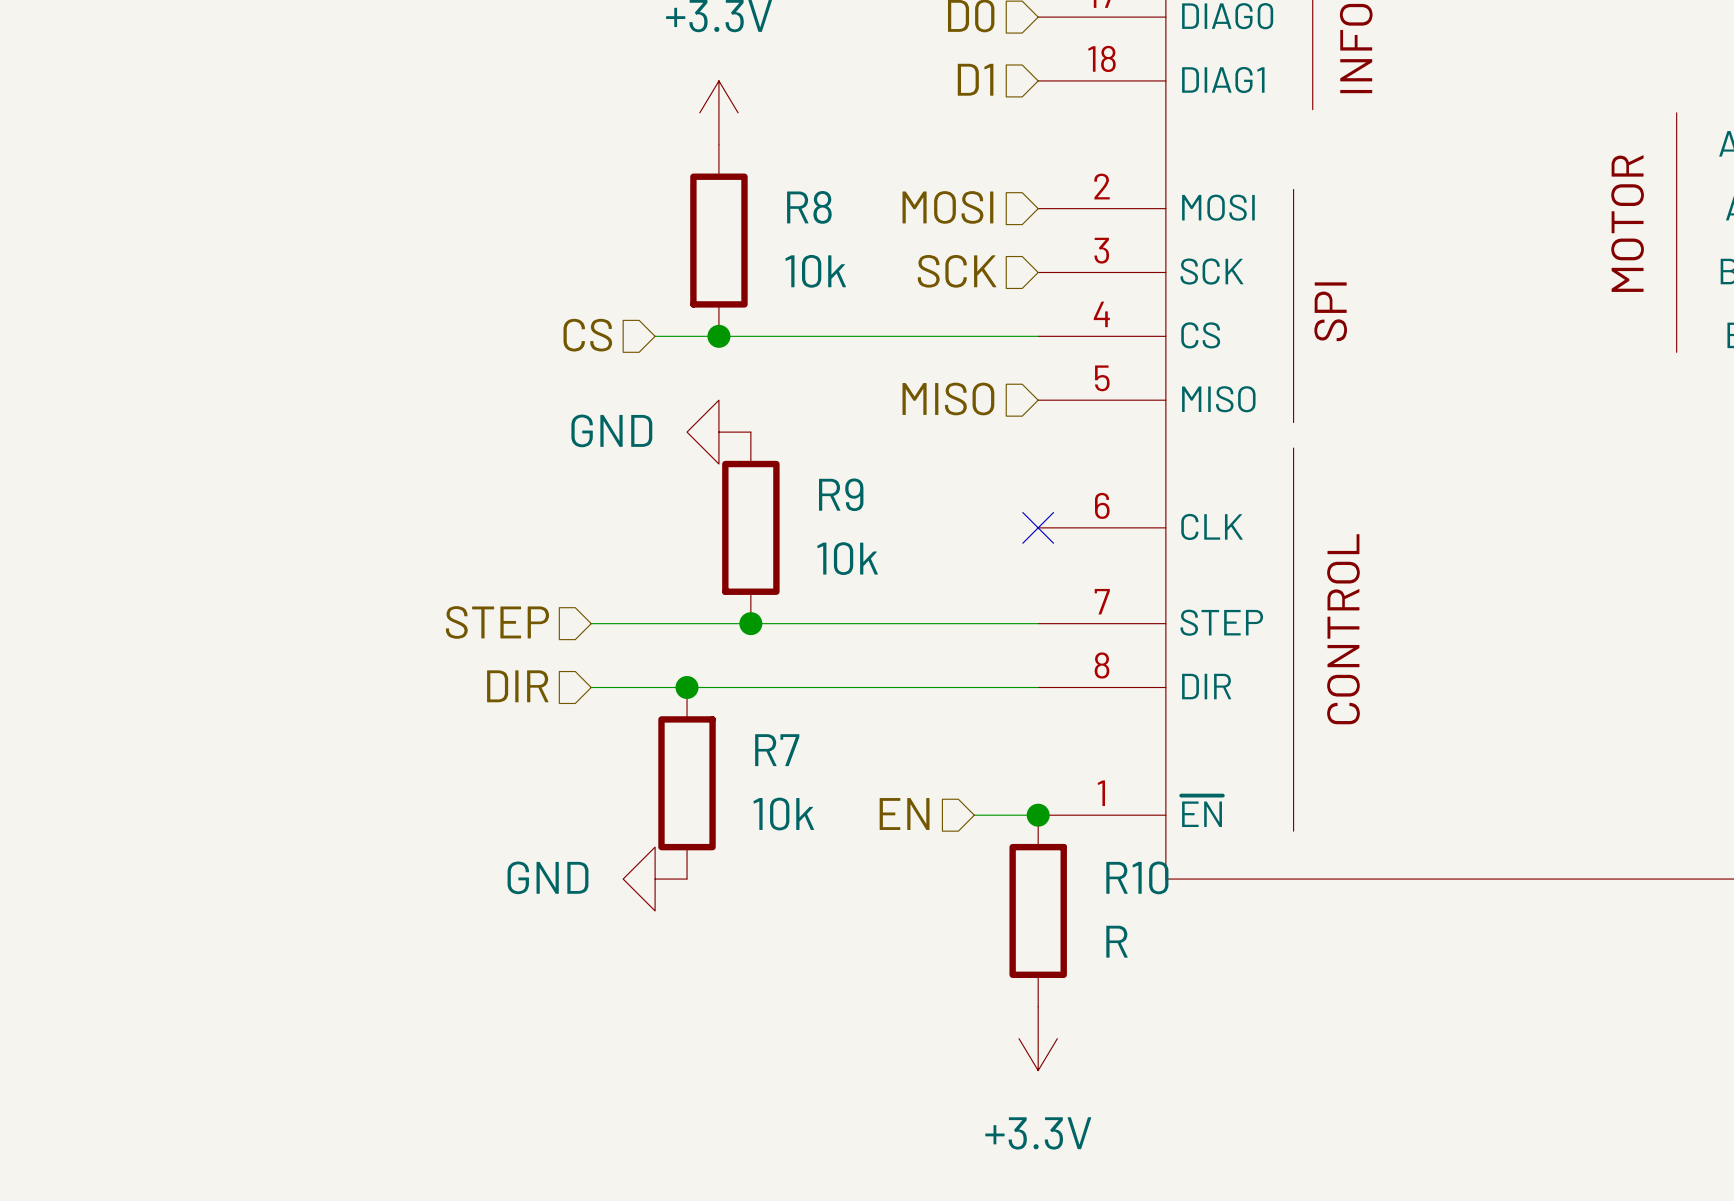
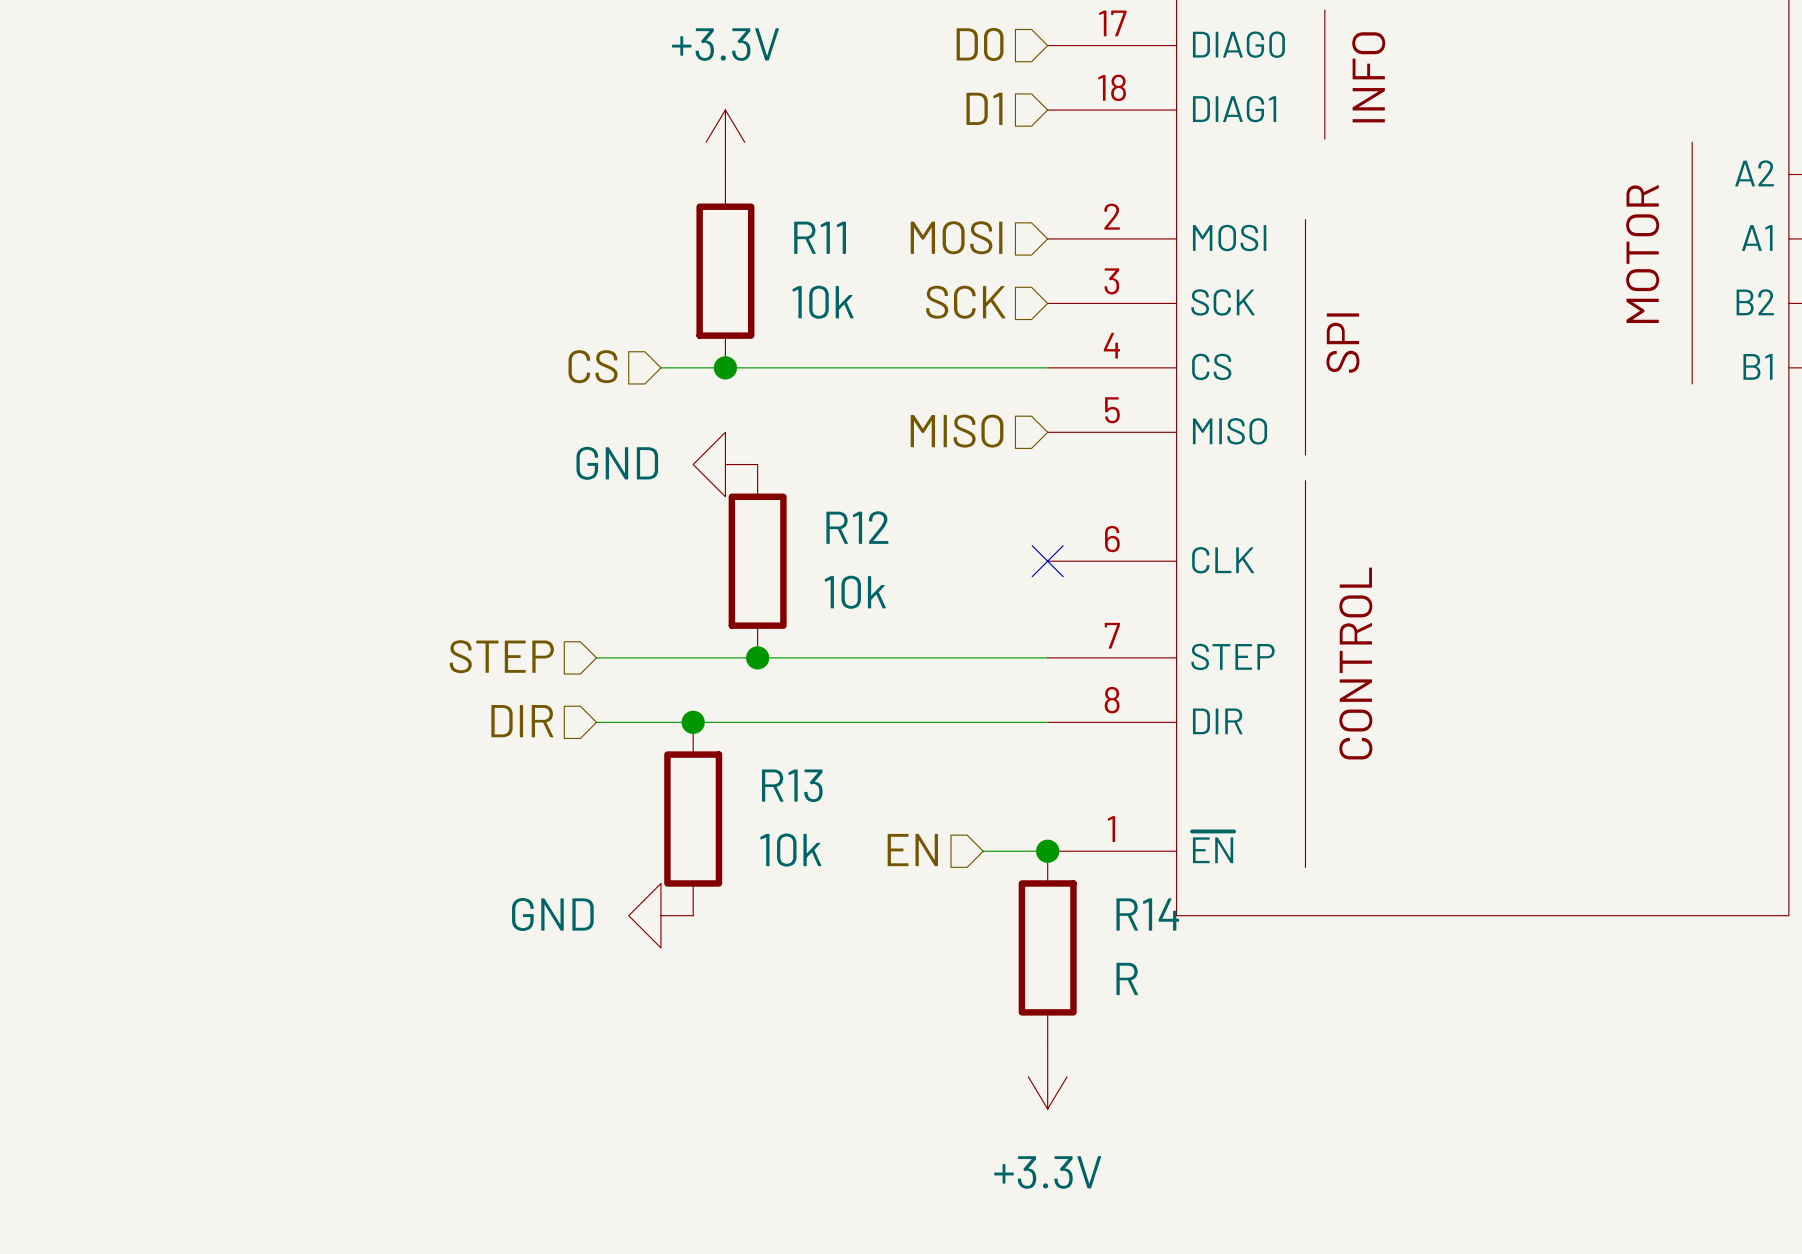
R8 name: R8 (809, 207) -> R11 (820, 237)
R9 name: R9 (841, 494) -> R12 (857, 527)
R7 name: R7 (777, 750) -> R13 (792, 785)
R10 name: R10 (1137, 877) -> R14 (1147, 914)

